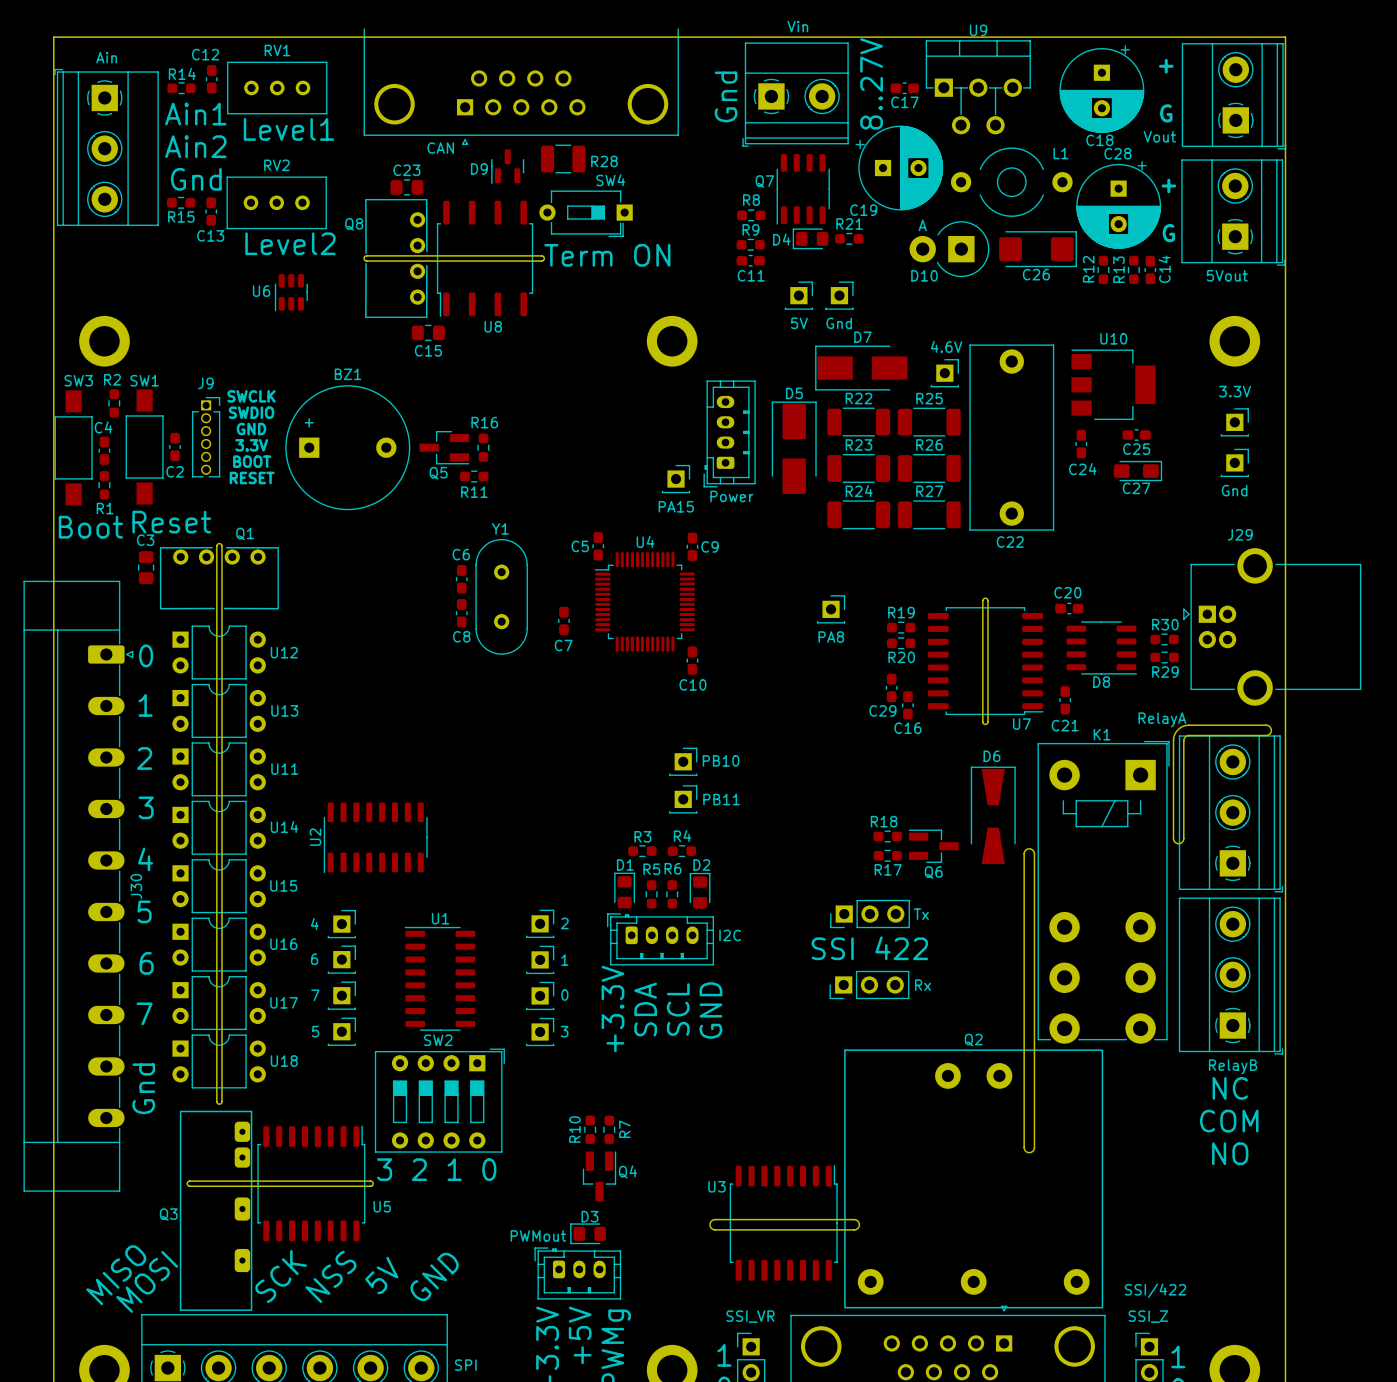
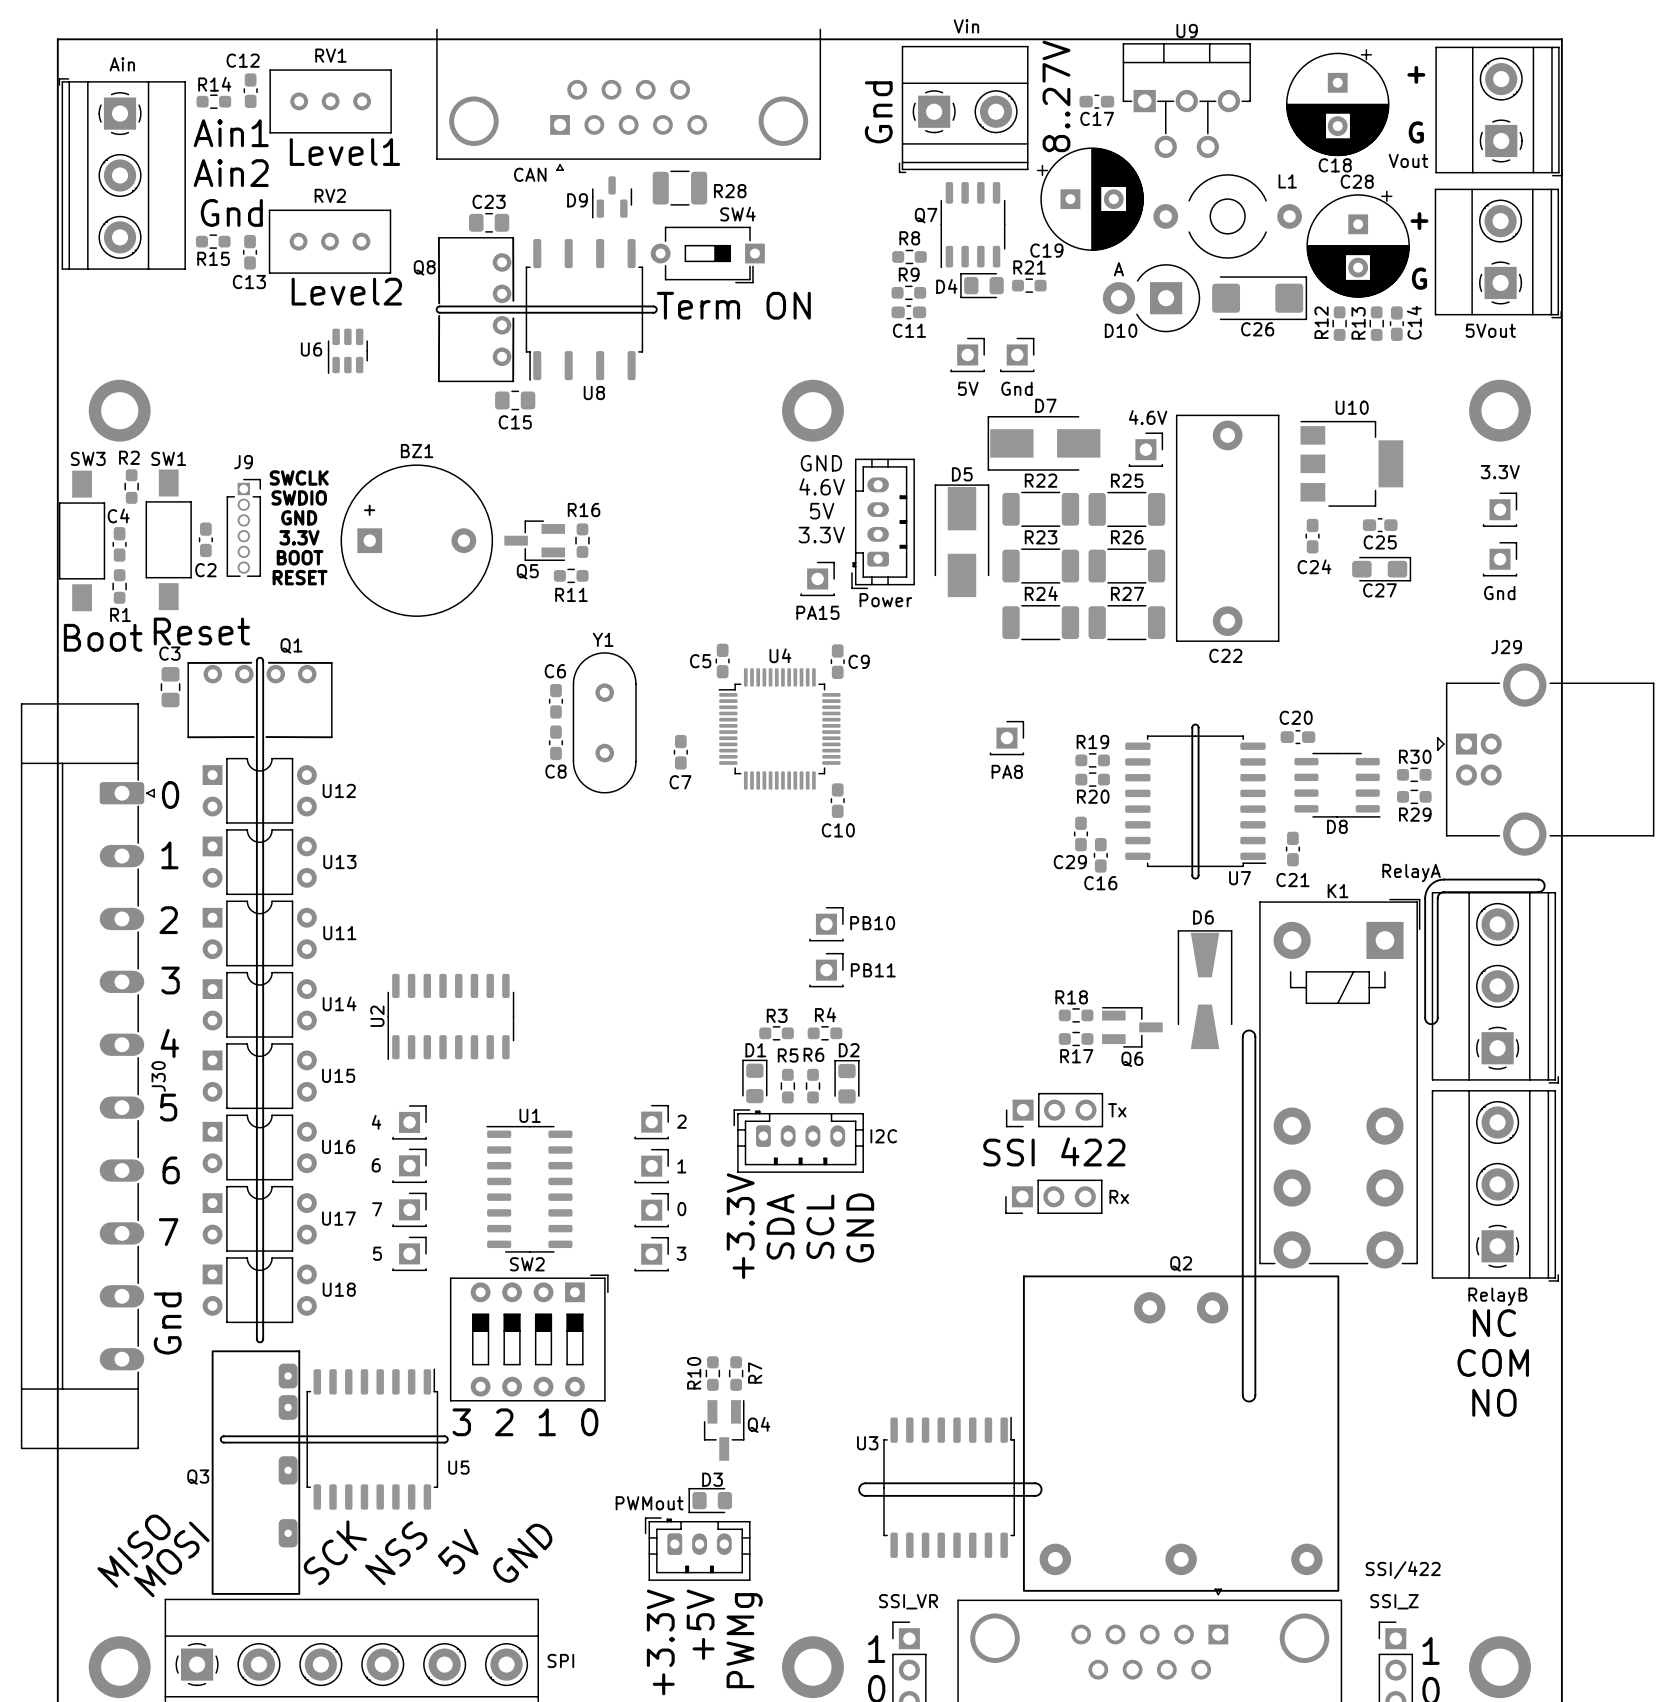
text: none -> GND (821, 463)
text: none -> 4.6V (822, 486)
text: none -> 5V (822, 511)
text: none -> 3.3V (821, 535)

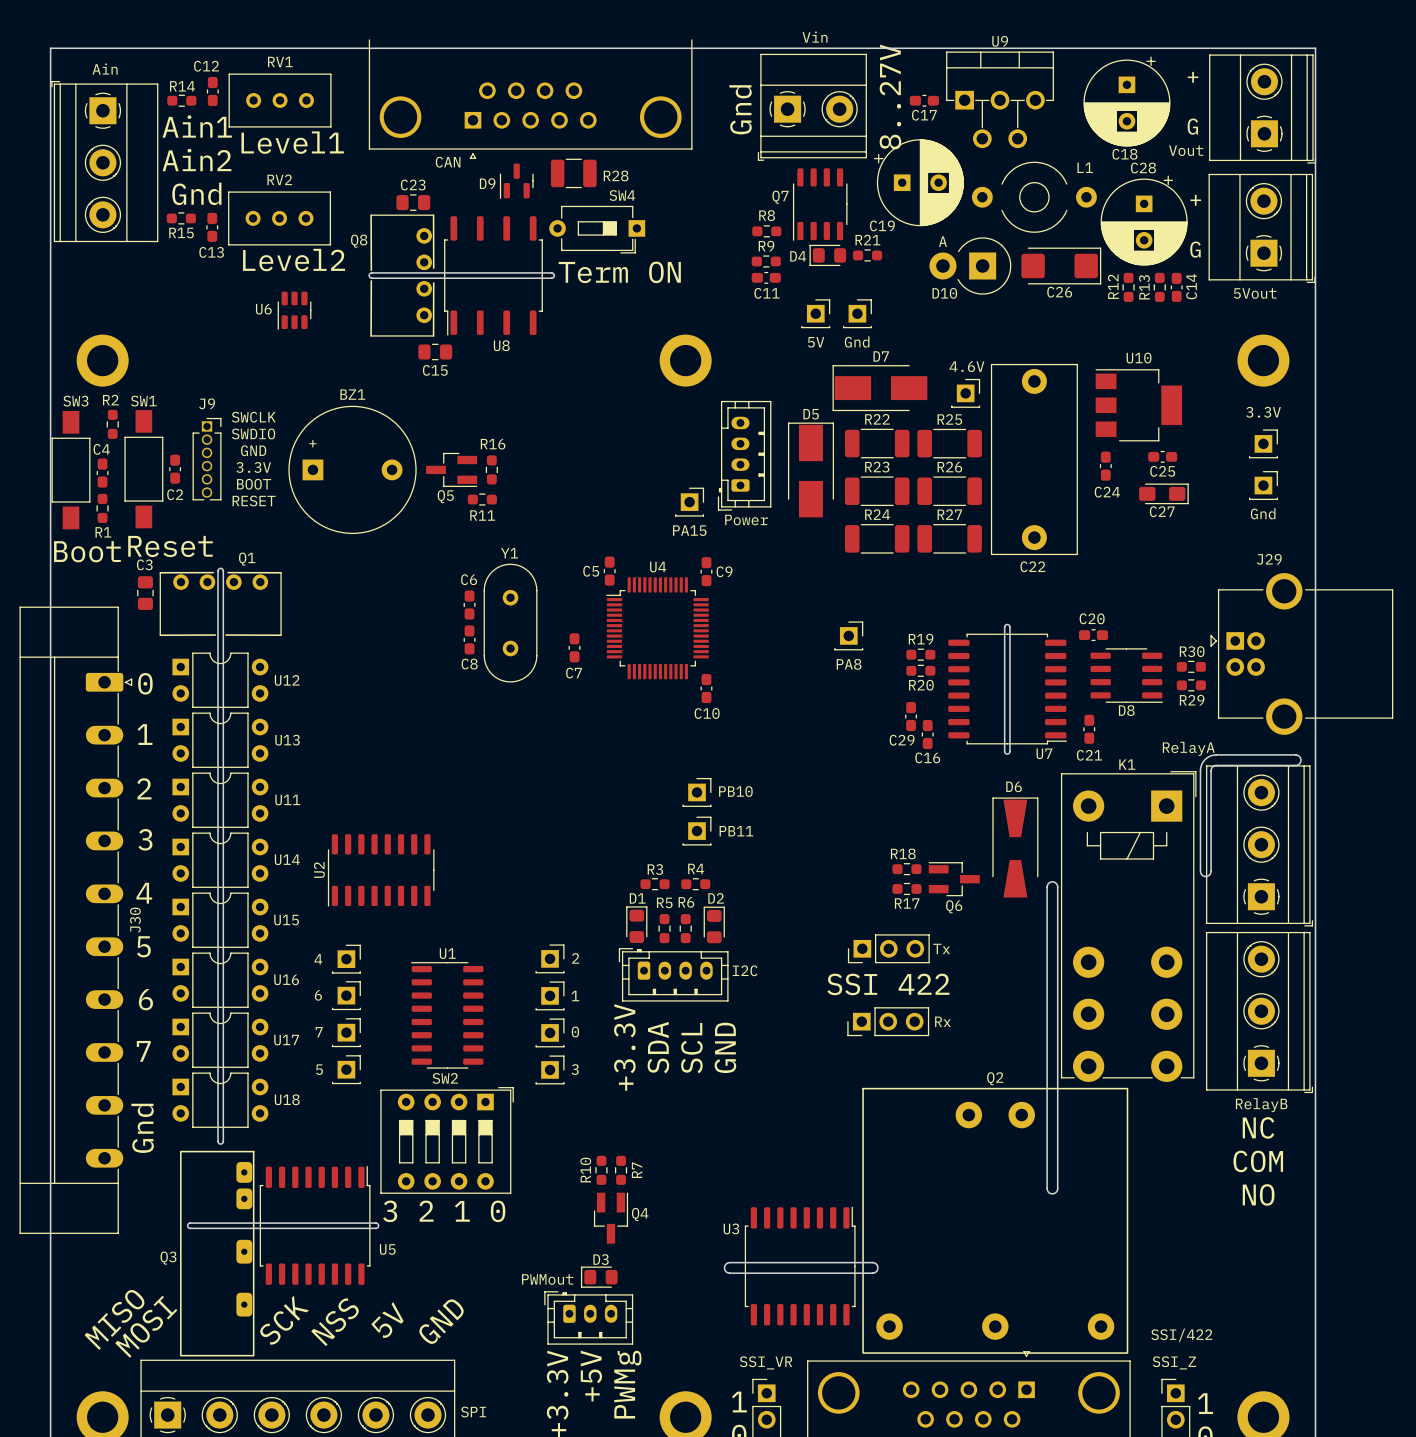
text: GND (821, 463) -> none
text: 4.6V (822, 486) -> none
text: 5V (822, 511) -> none
text: 3.3V (821, 535) -> none

